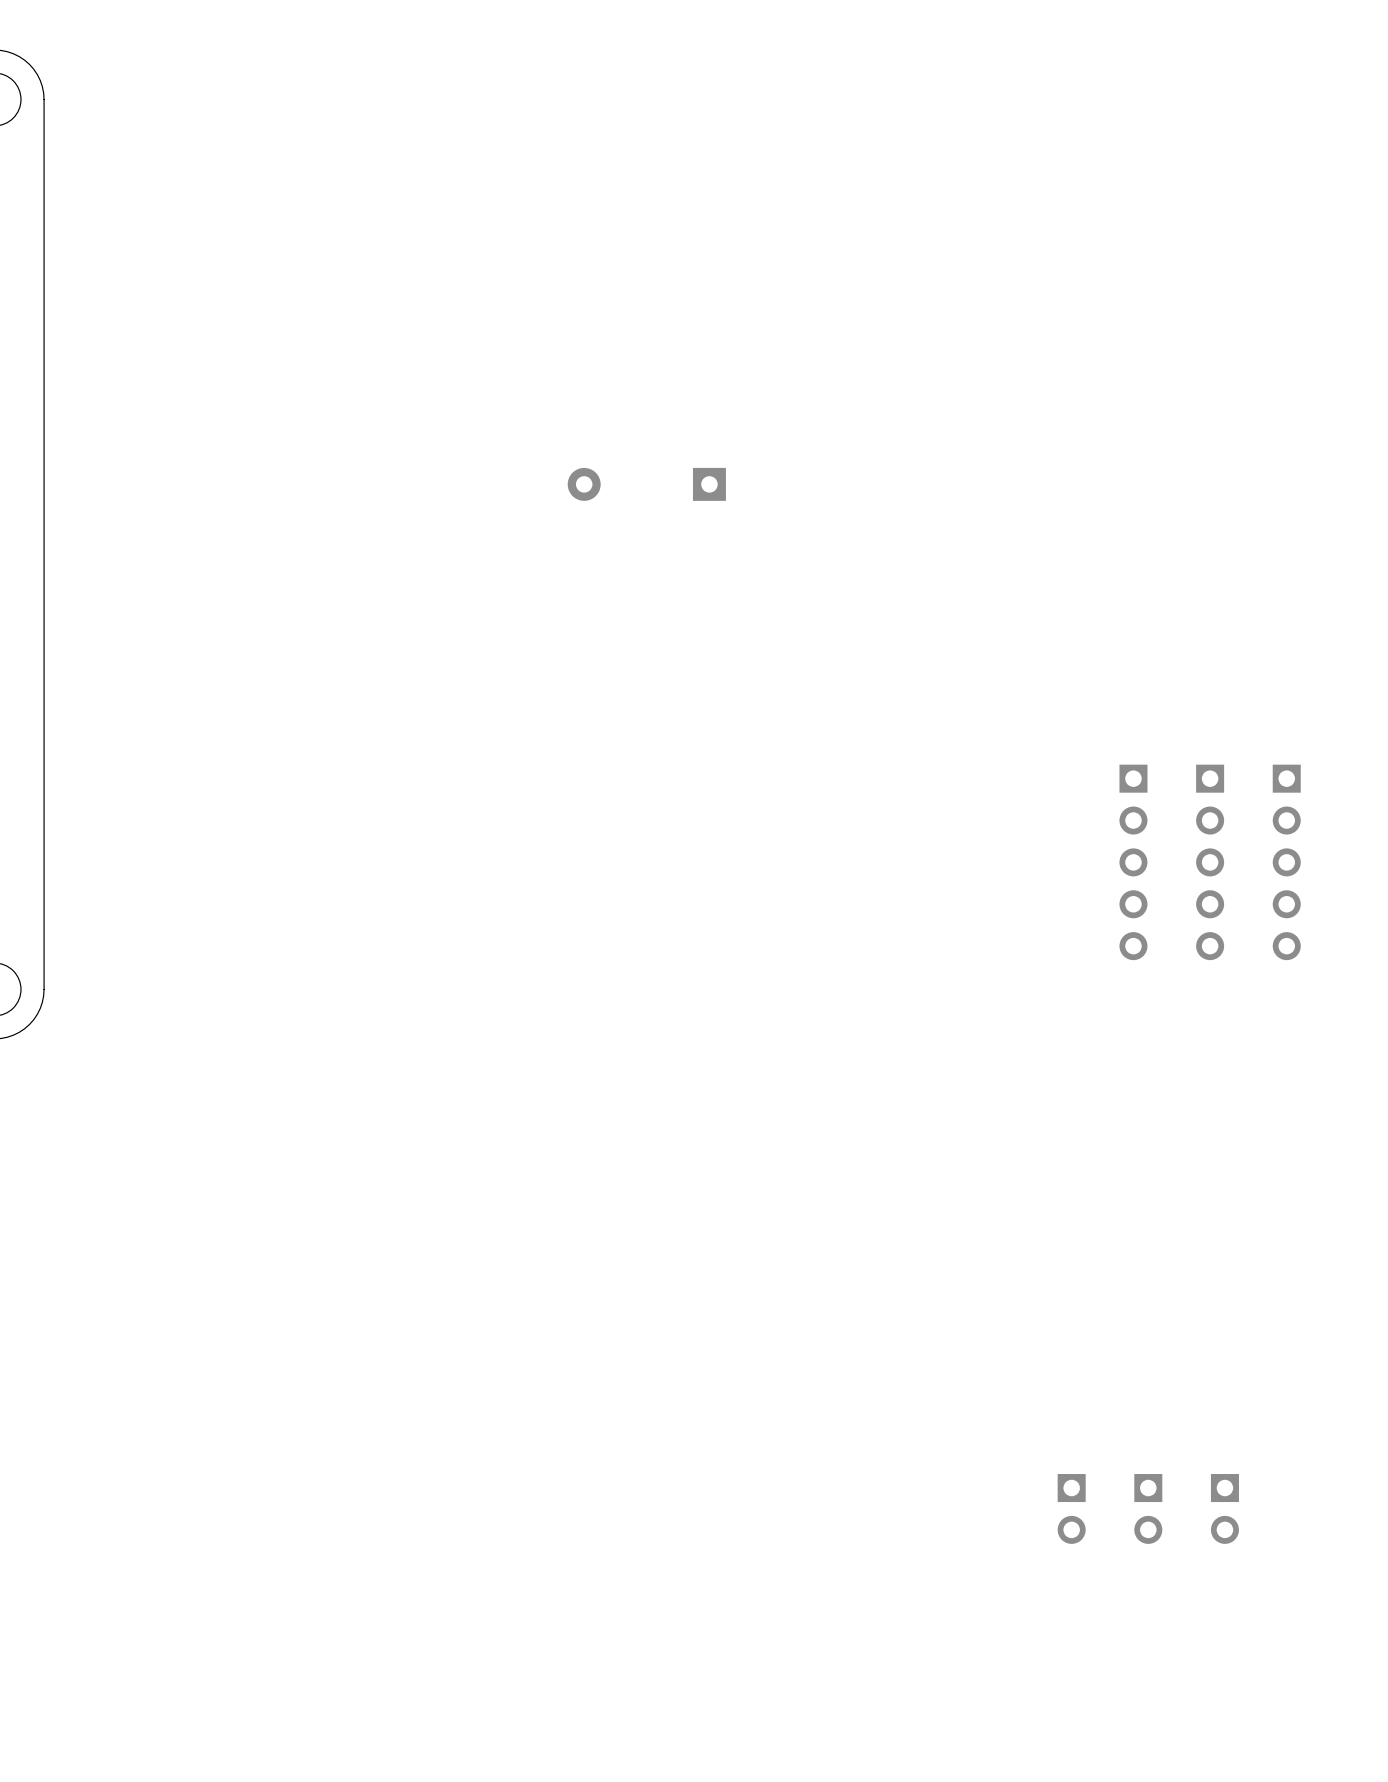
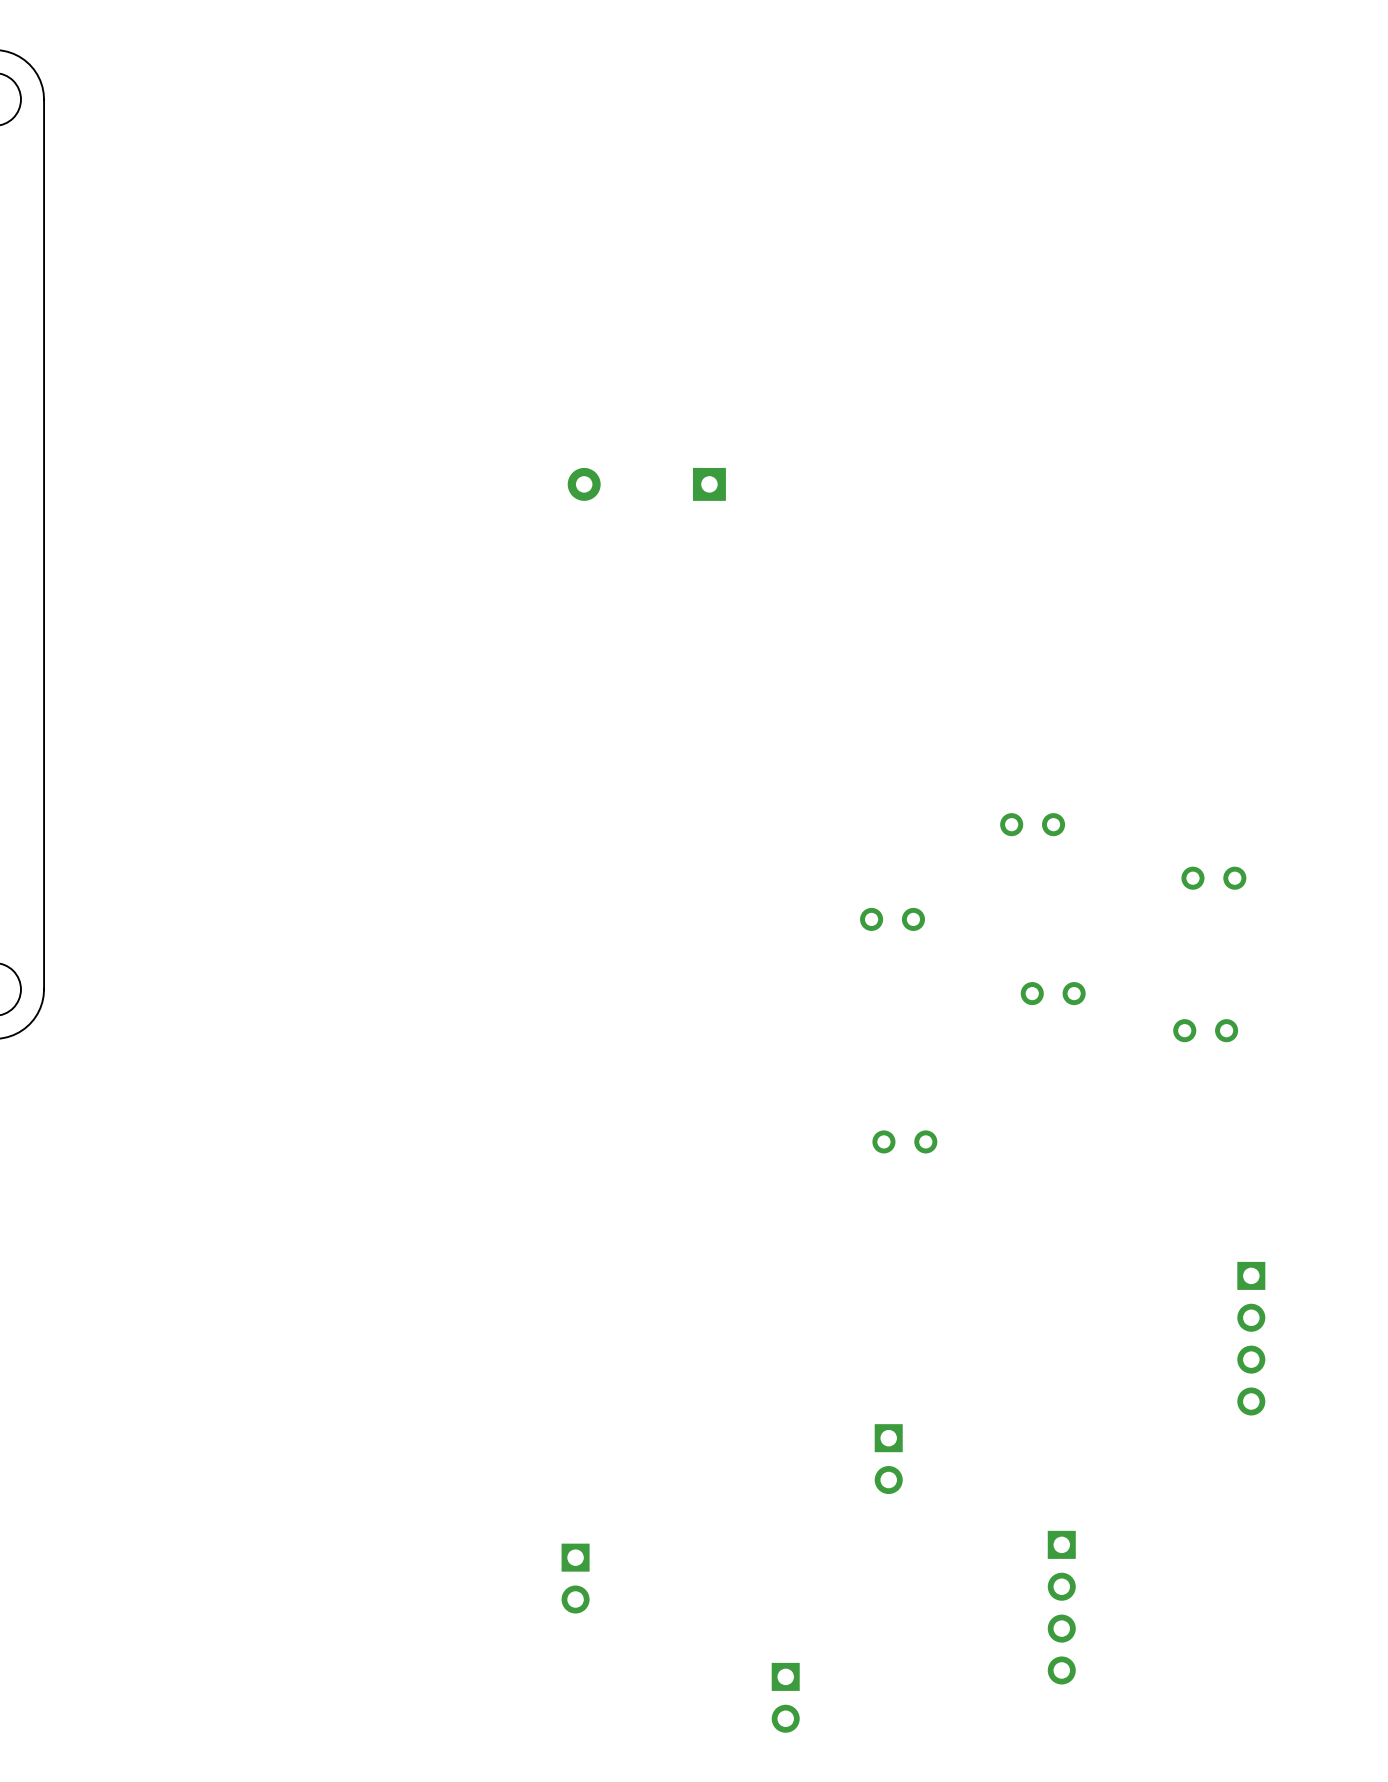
part footprint: [1196, 764, 1225, 961] -> [1181, 866, 1247, 890]
part: none -> (1032, 824)
part: (1133, 862) -> none
part: (1286, 862) -> none
part: none -> (892, 919)
part: none -> (1053, 993)
part: none -> (1205, 1030)
part: none -> (904, 1141)
part: none -> (1251, 1338)
part: none -> (888, 1459)
part: (1071, 1508) -> none
part: (1148, 1508) -> none
part: (1224, 1508) -> none
part: none -> (575, 1578)
part: none -> (1061, 1607)
part: none -> (785, 1697)

